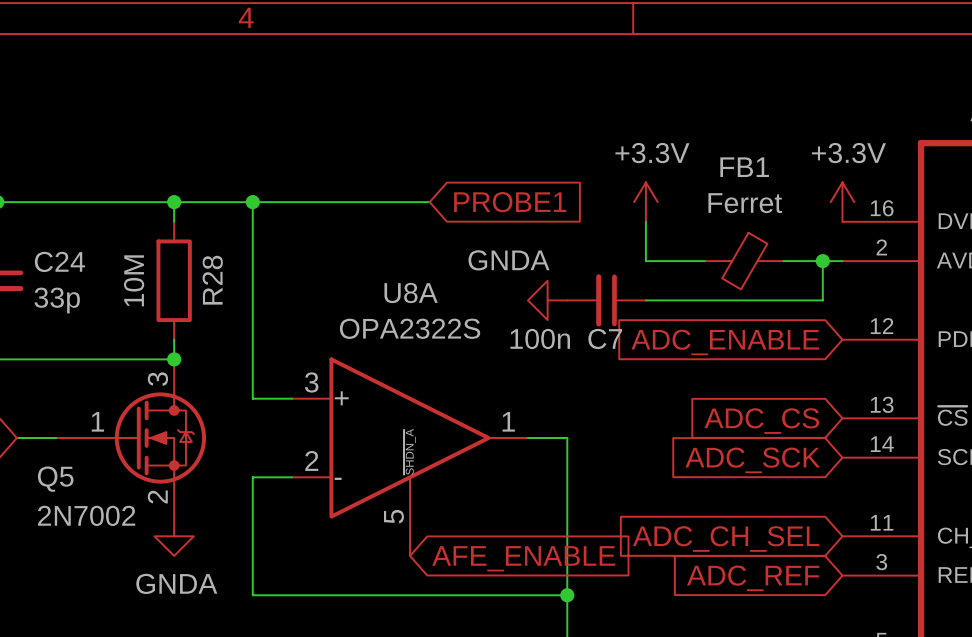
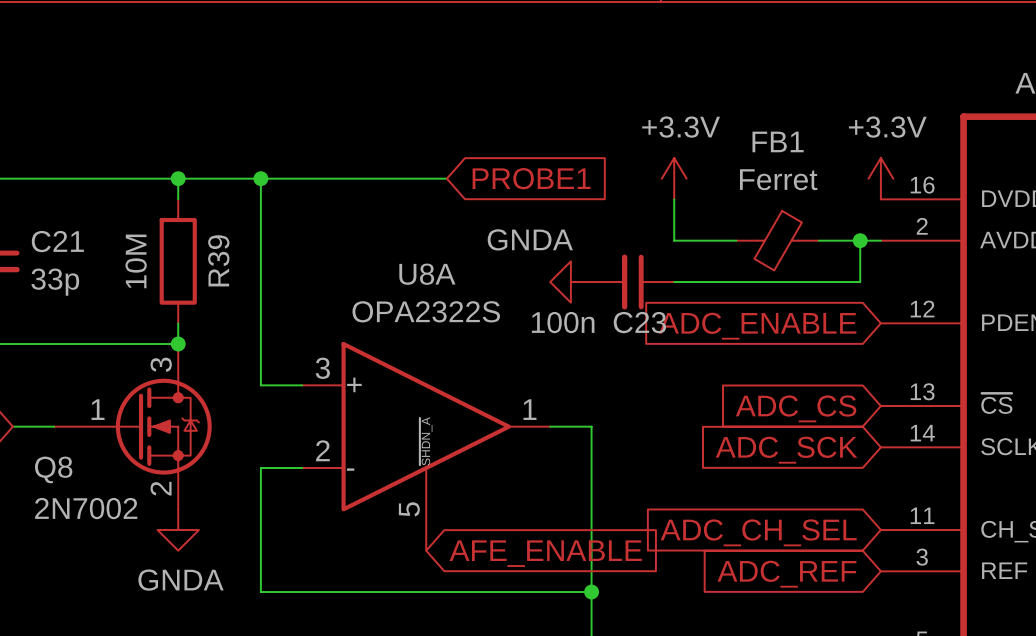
C24 name: C24 (59, 261) -> C21 (57, 241)
R28 name: R28 (212, 280) -> R39 (218, 260)
C7 name: C7 (605, 338) -> C23 (639, 322)
Q5 name: Q5 (55, 479) -> Q8 (53, 469)

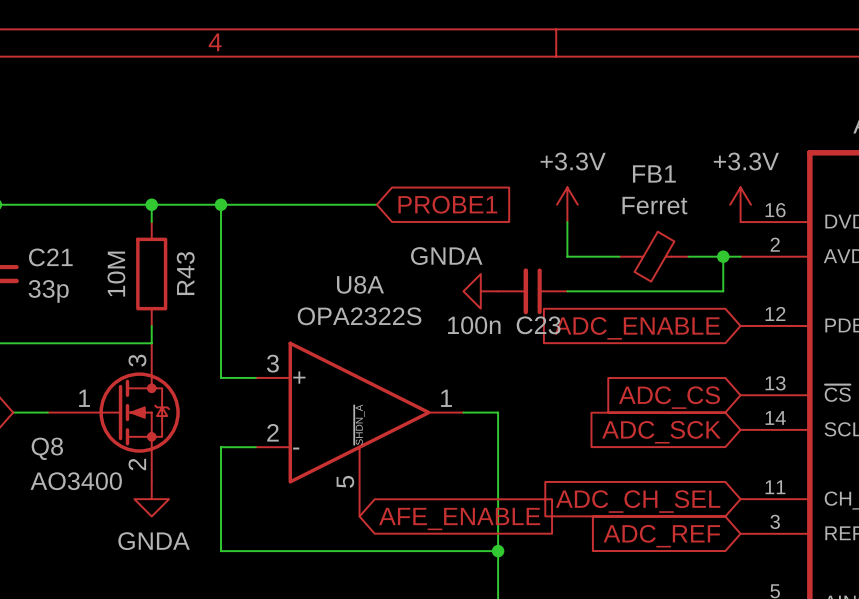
R39 name: R39 (218, 260) -> R43 (185, 273)
junction: (178, 344) -> none
Q8 value: 2N7002 (86, 508) -> AO3400 (76, 481)

